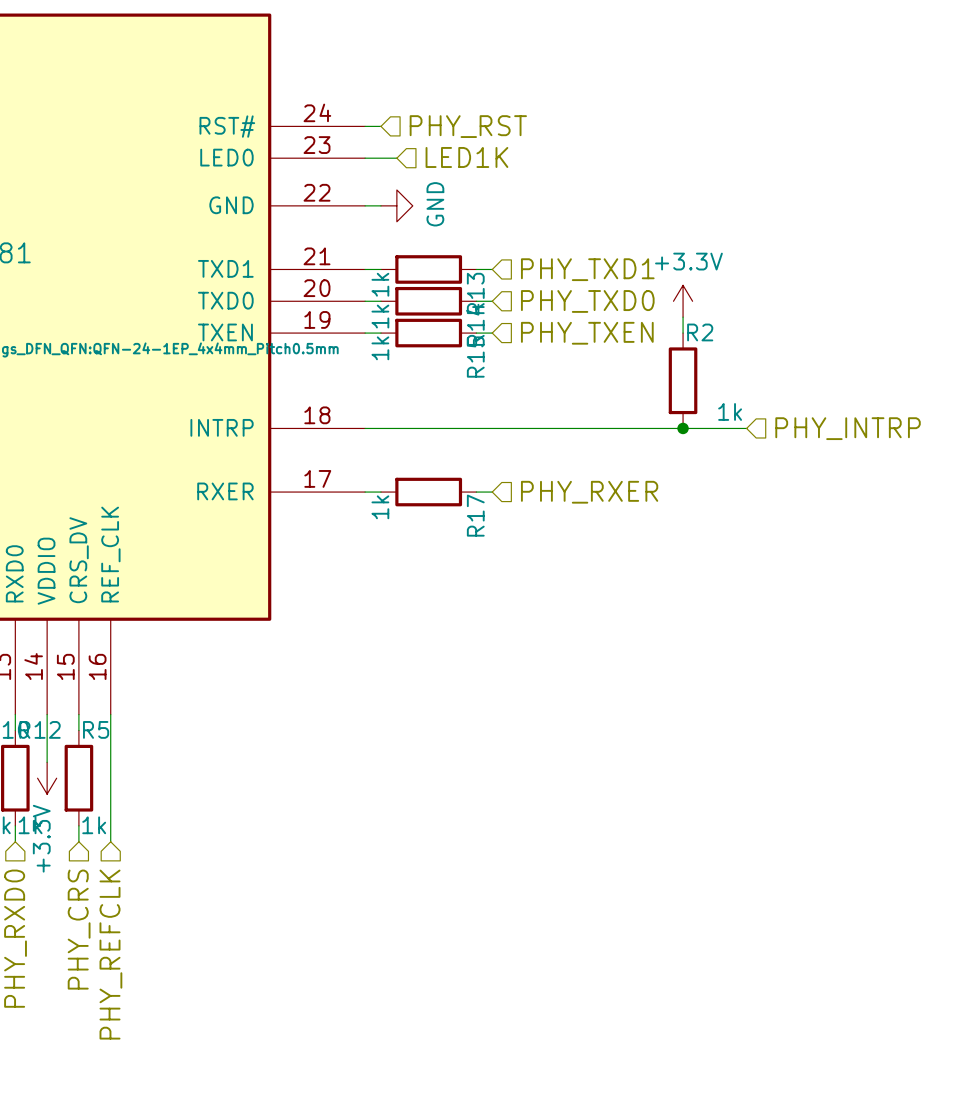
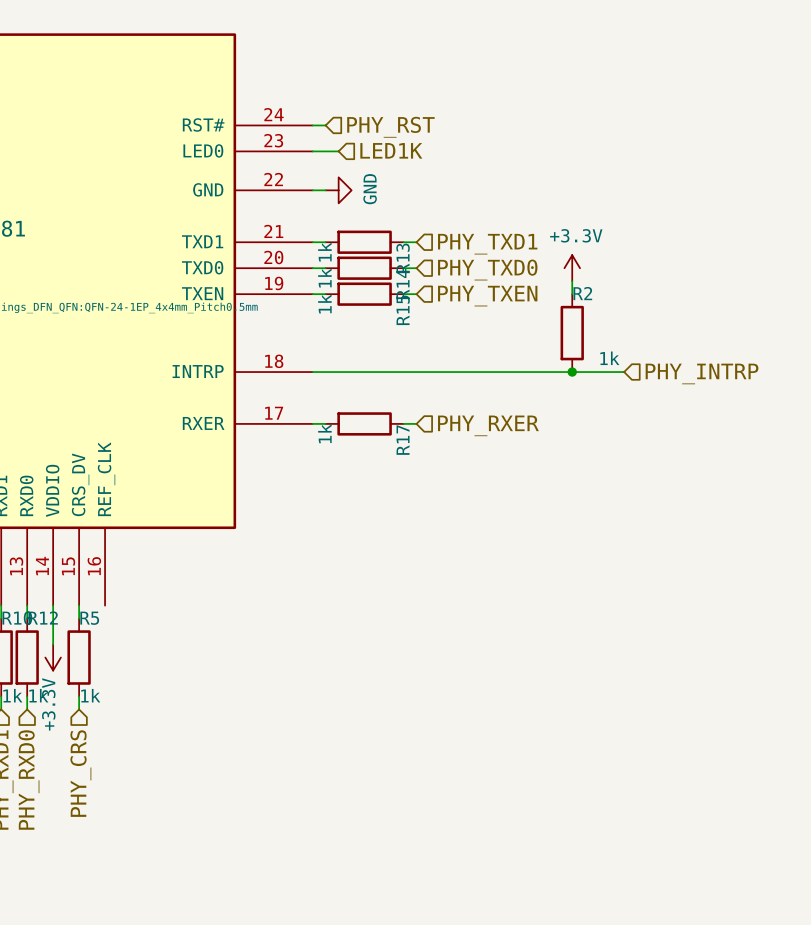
wire: (110, 714) (110, 841) -> none
hierarchical label: PHY_REFCLK (110, 954) -> none

